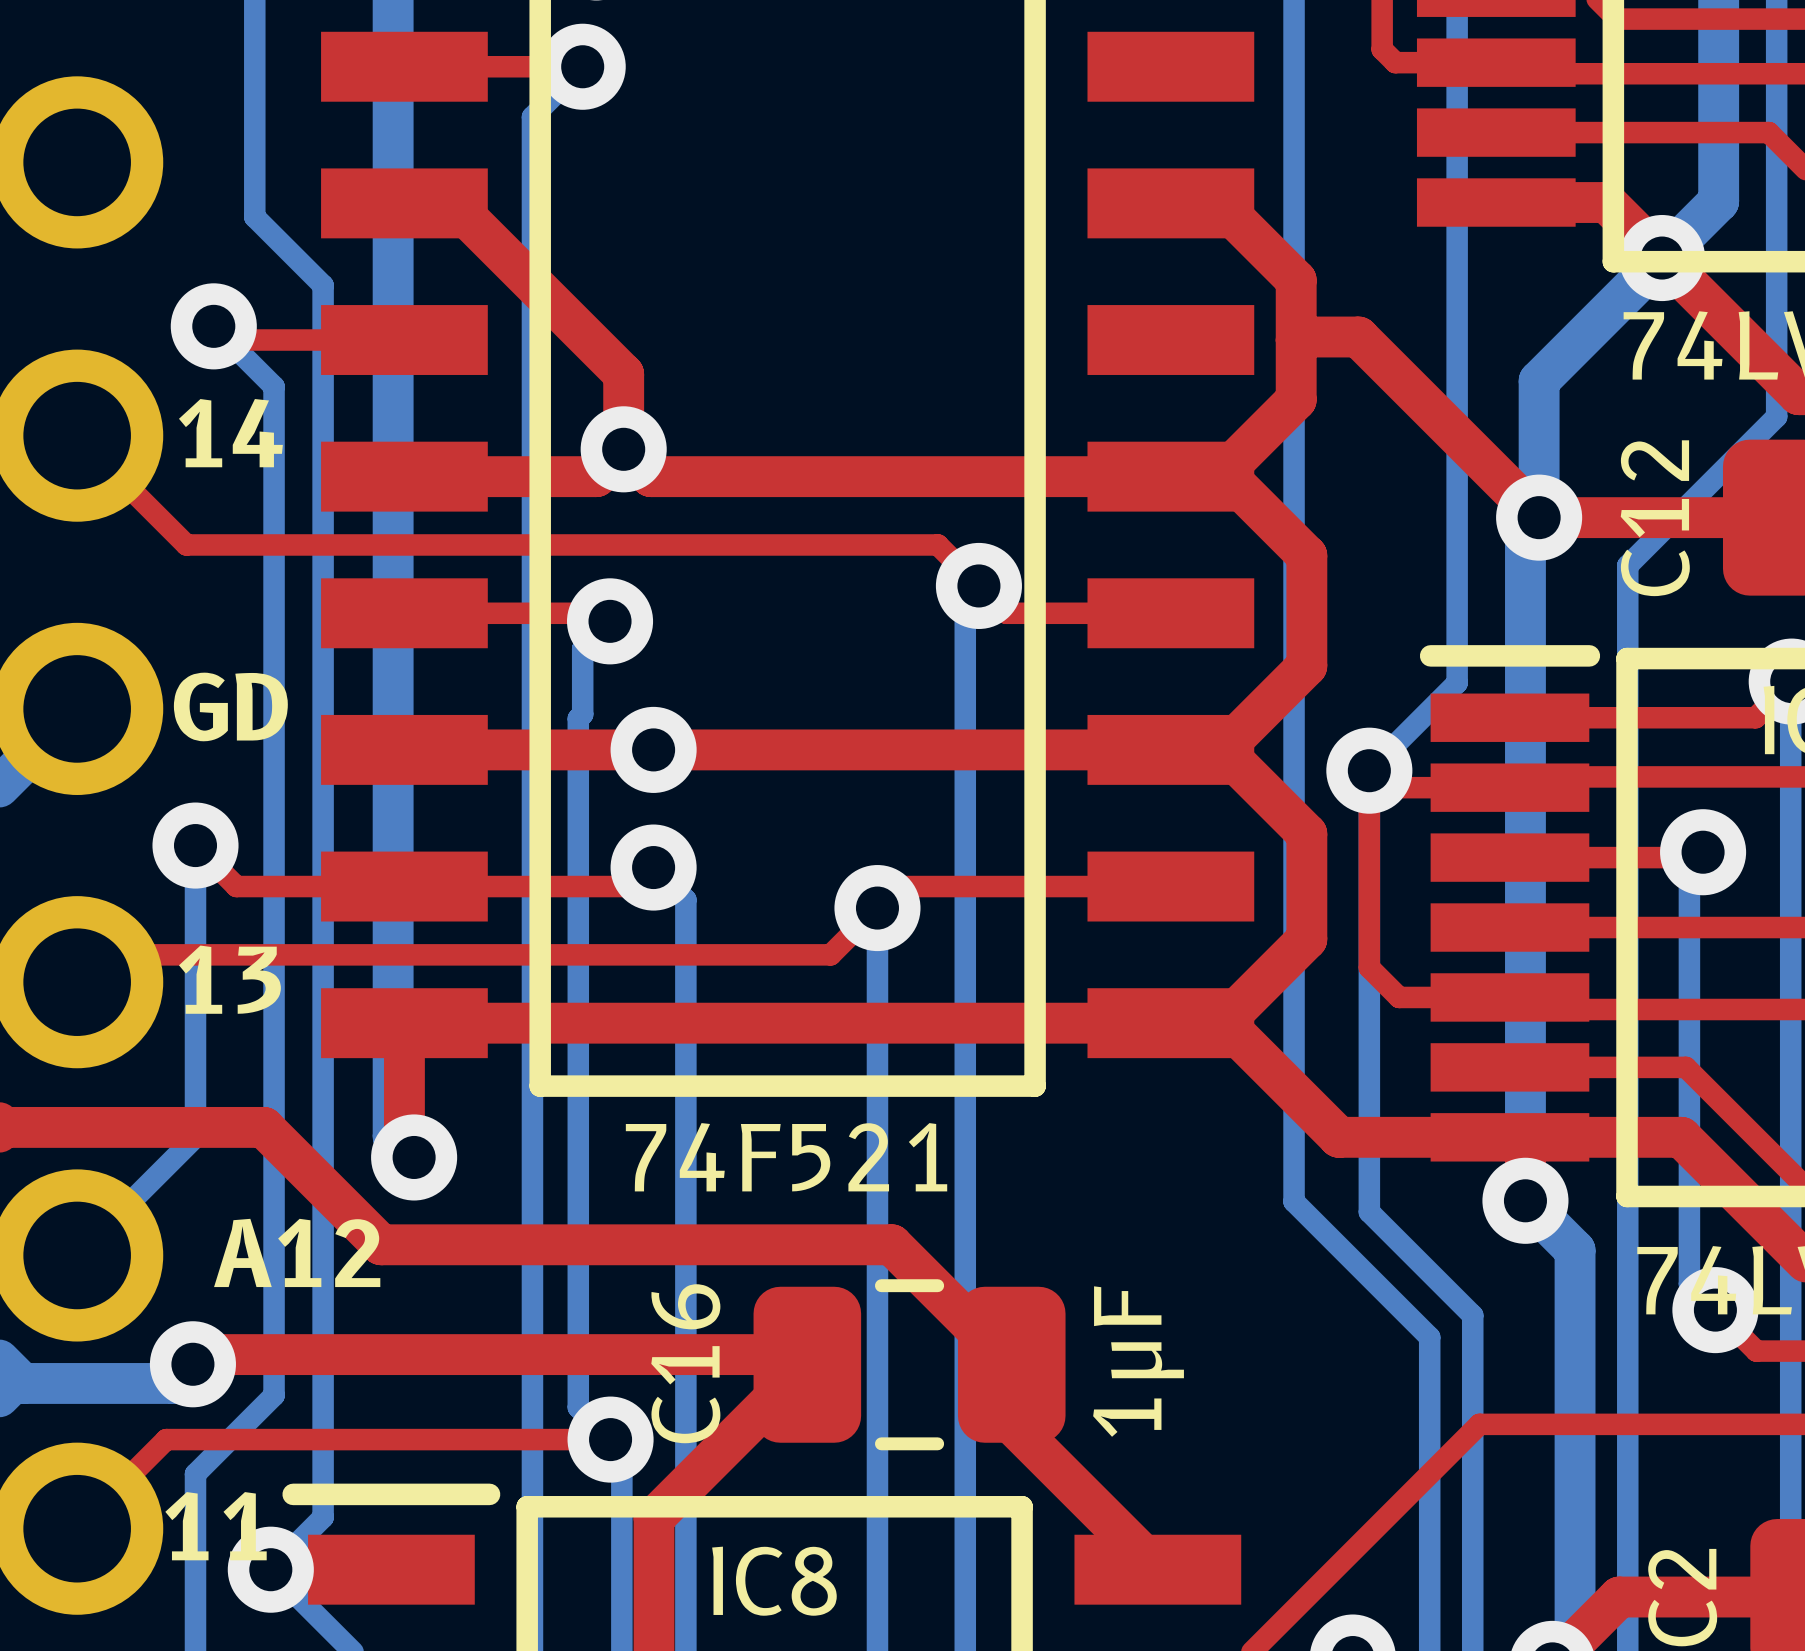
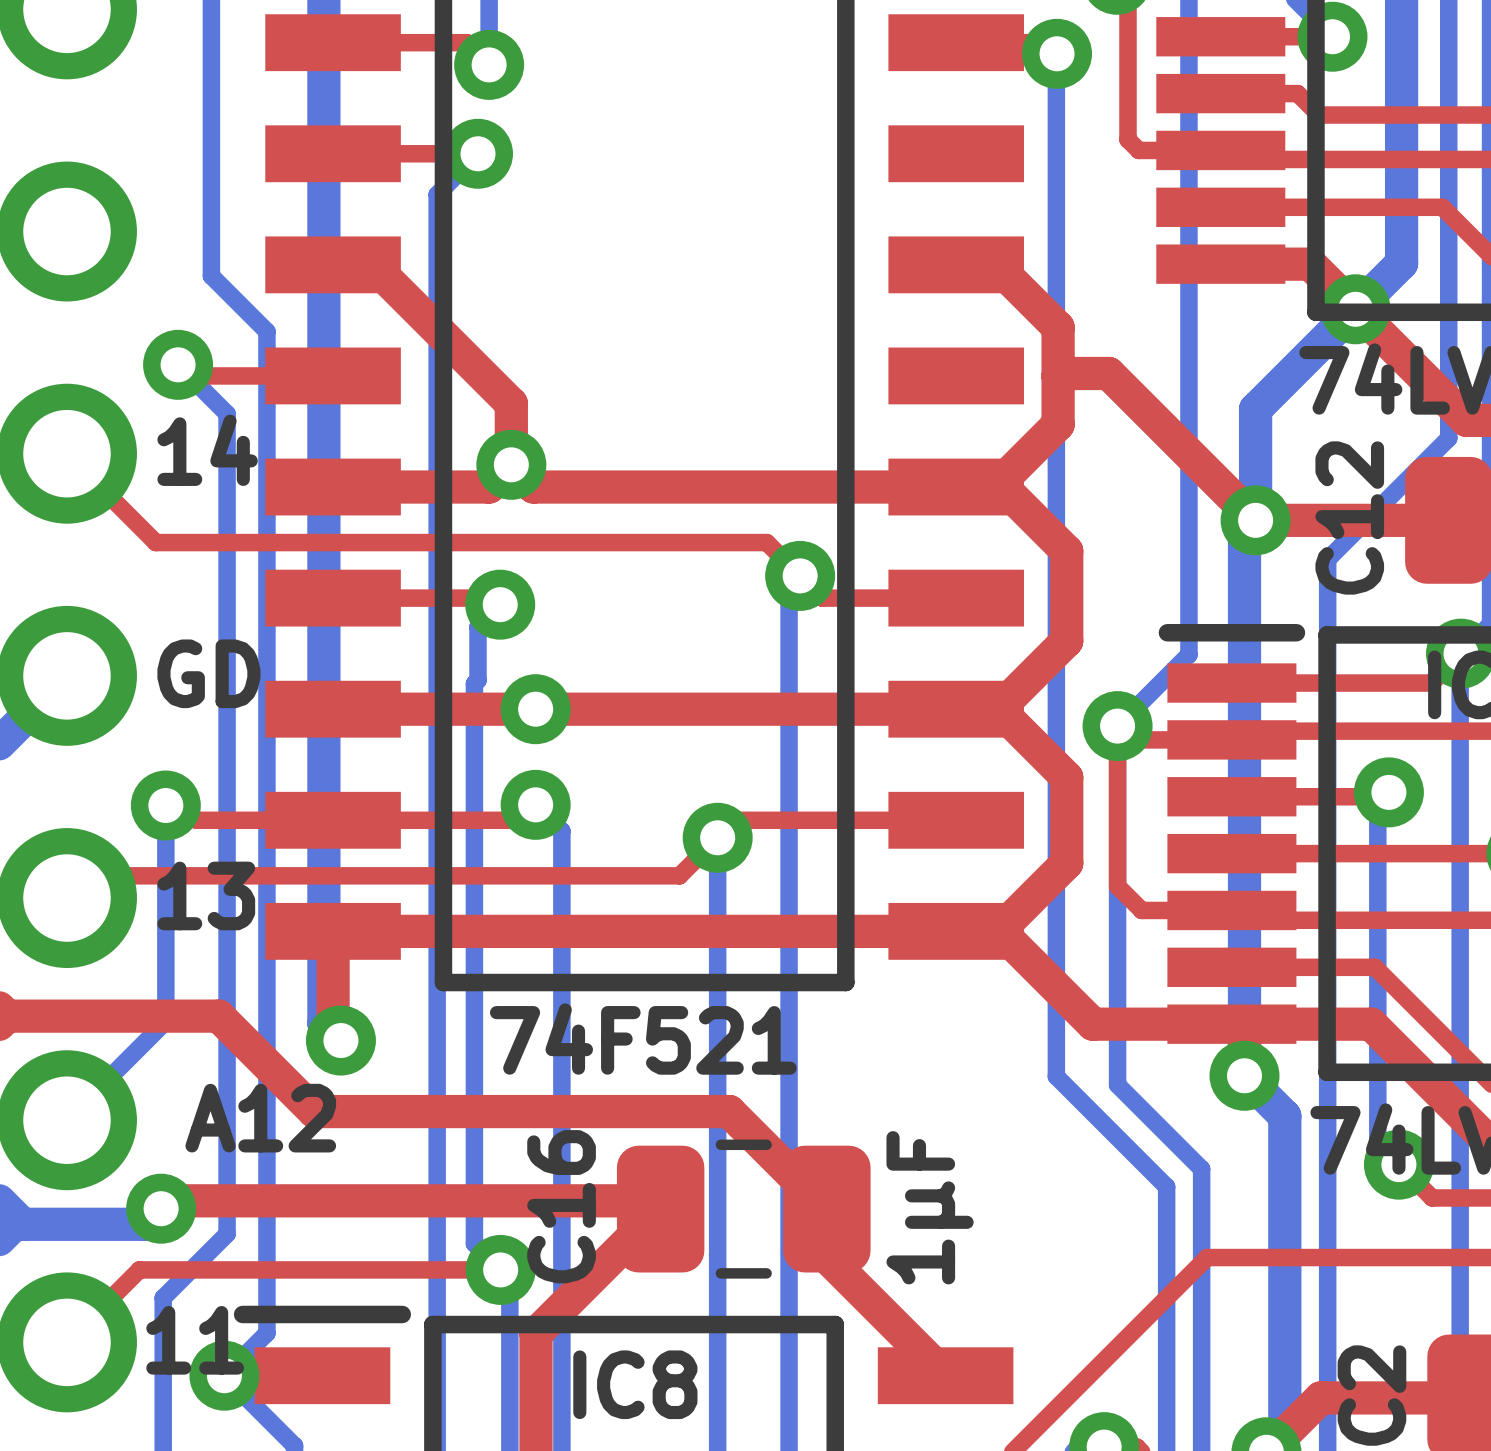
bottom track: (195, 845) (195, 1137) -> (165, 805) (165, 1021) (163, 1024)
via position: (195, 845) -> (165, 805)

